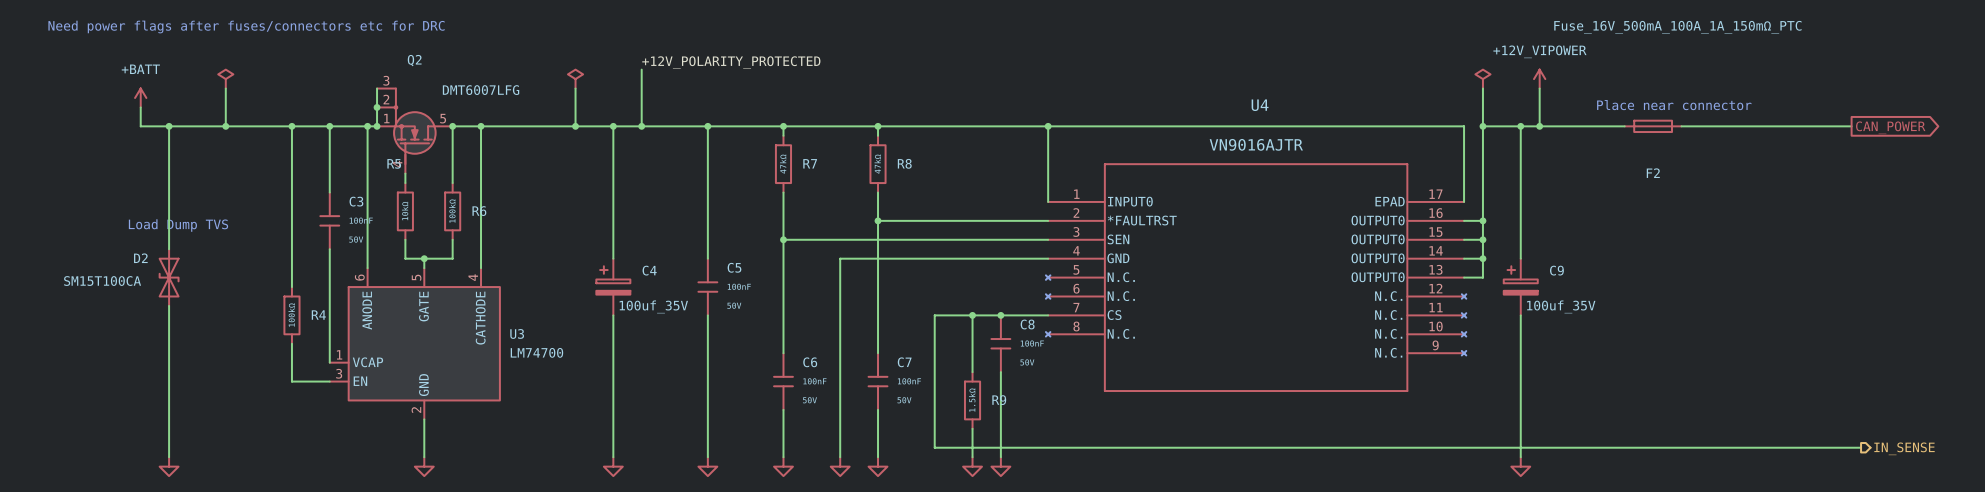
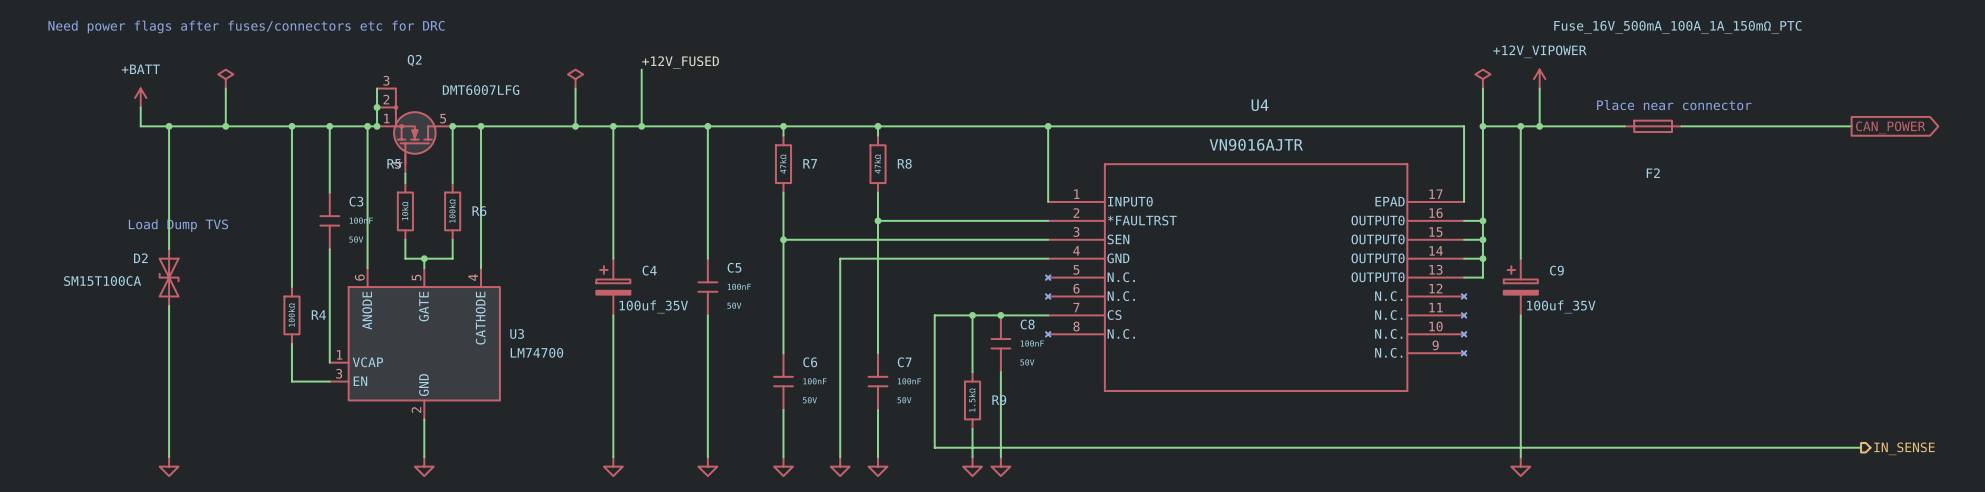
label: +12V_POLARITY_PROTECTED (731, 62) -> +12V_FUSED (680, 62)

